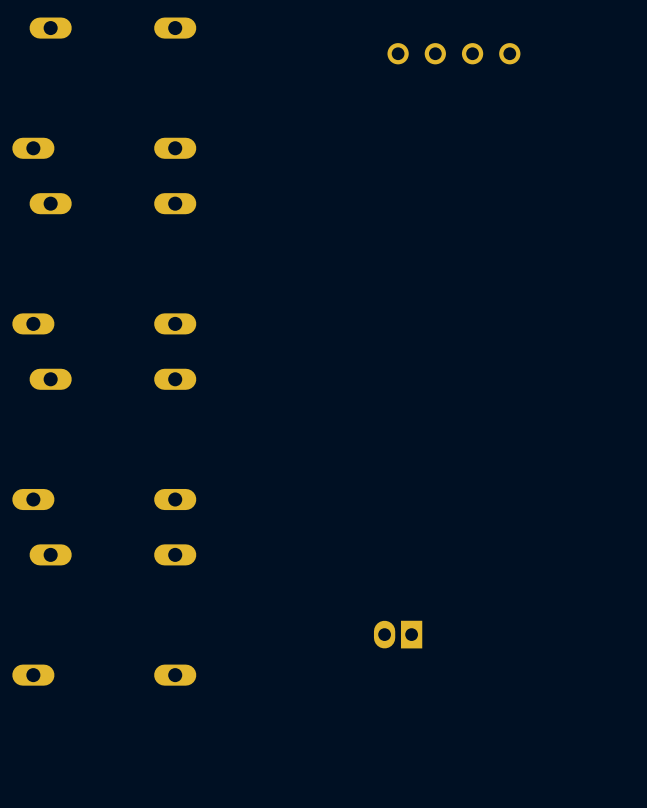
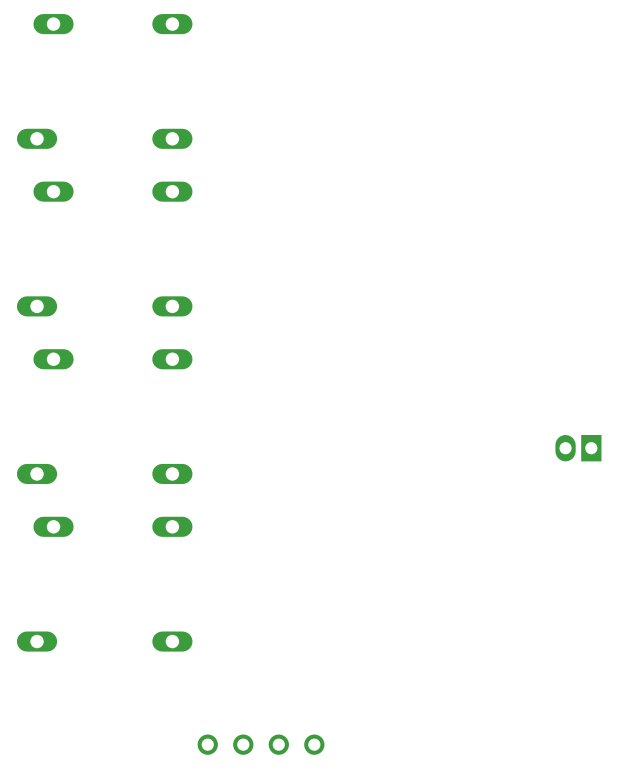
part: (453, 53) -> none
part position: (398, 634) -> (578, 448)
part: none -> (261, 744)

